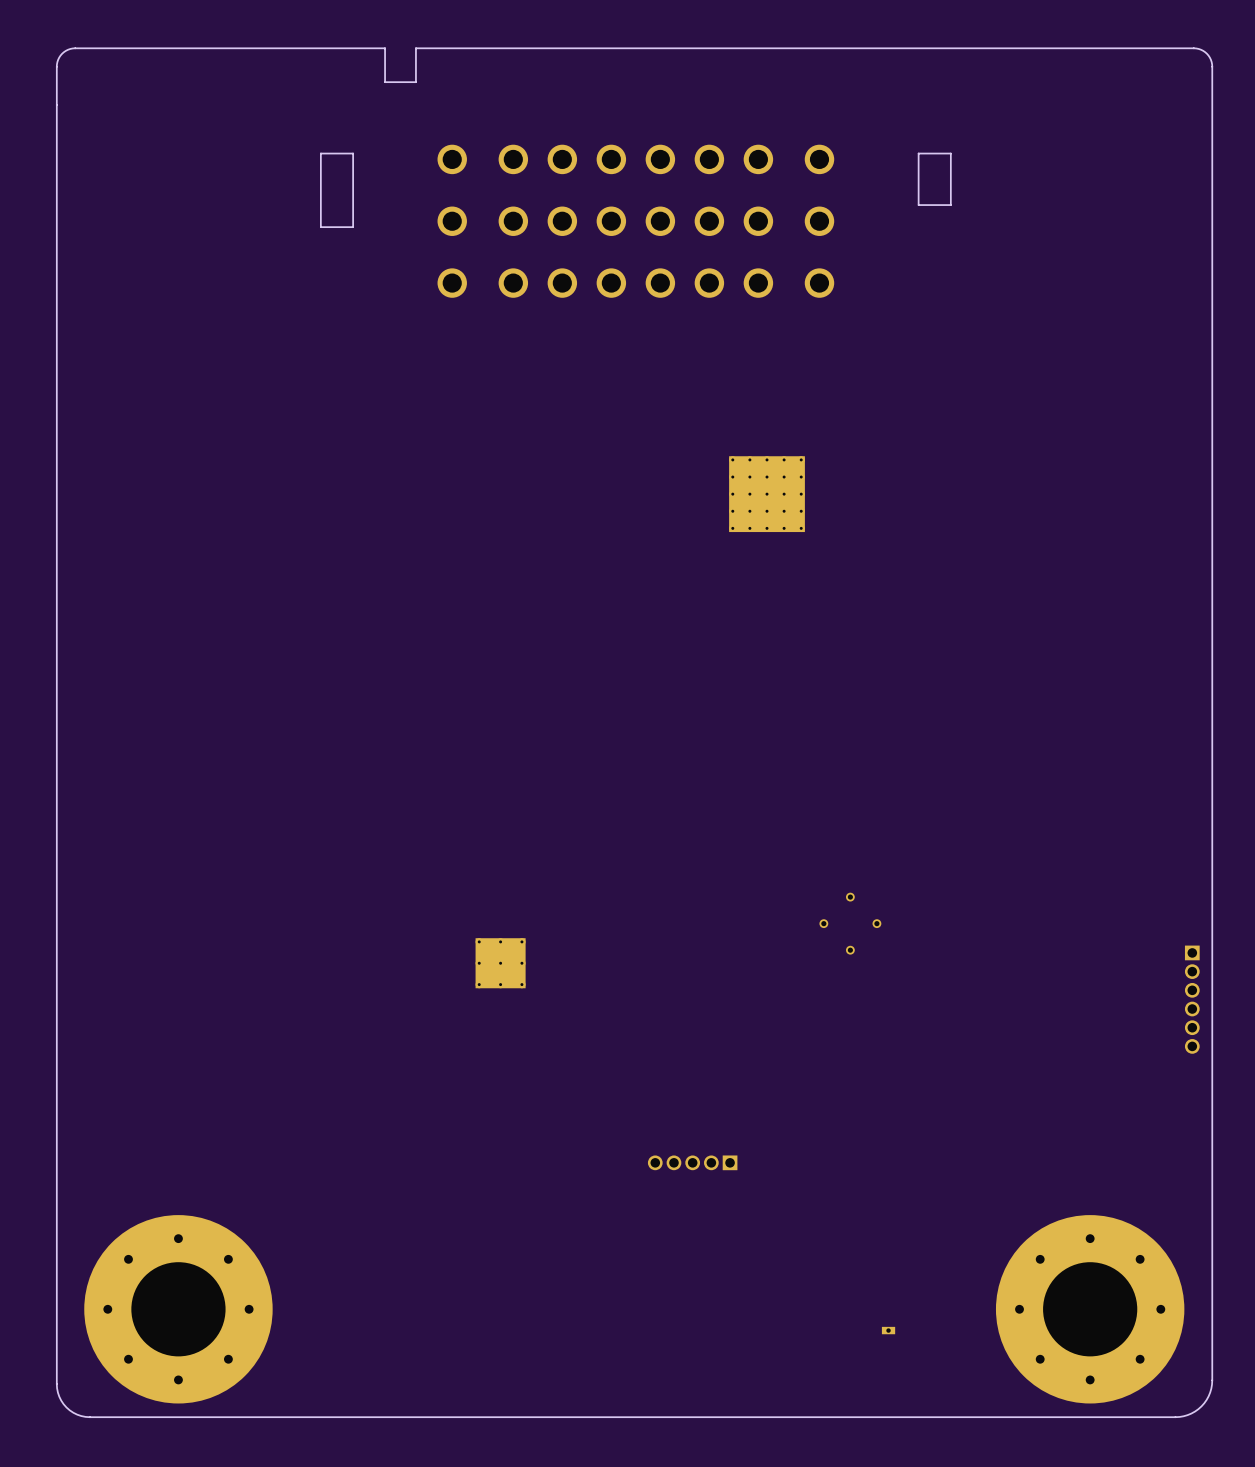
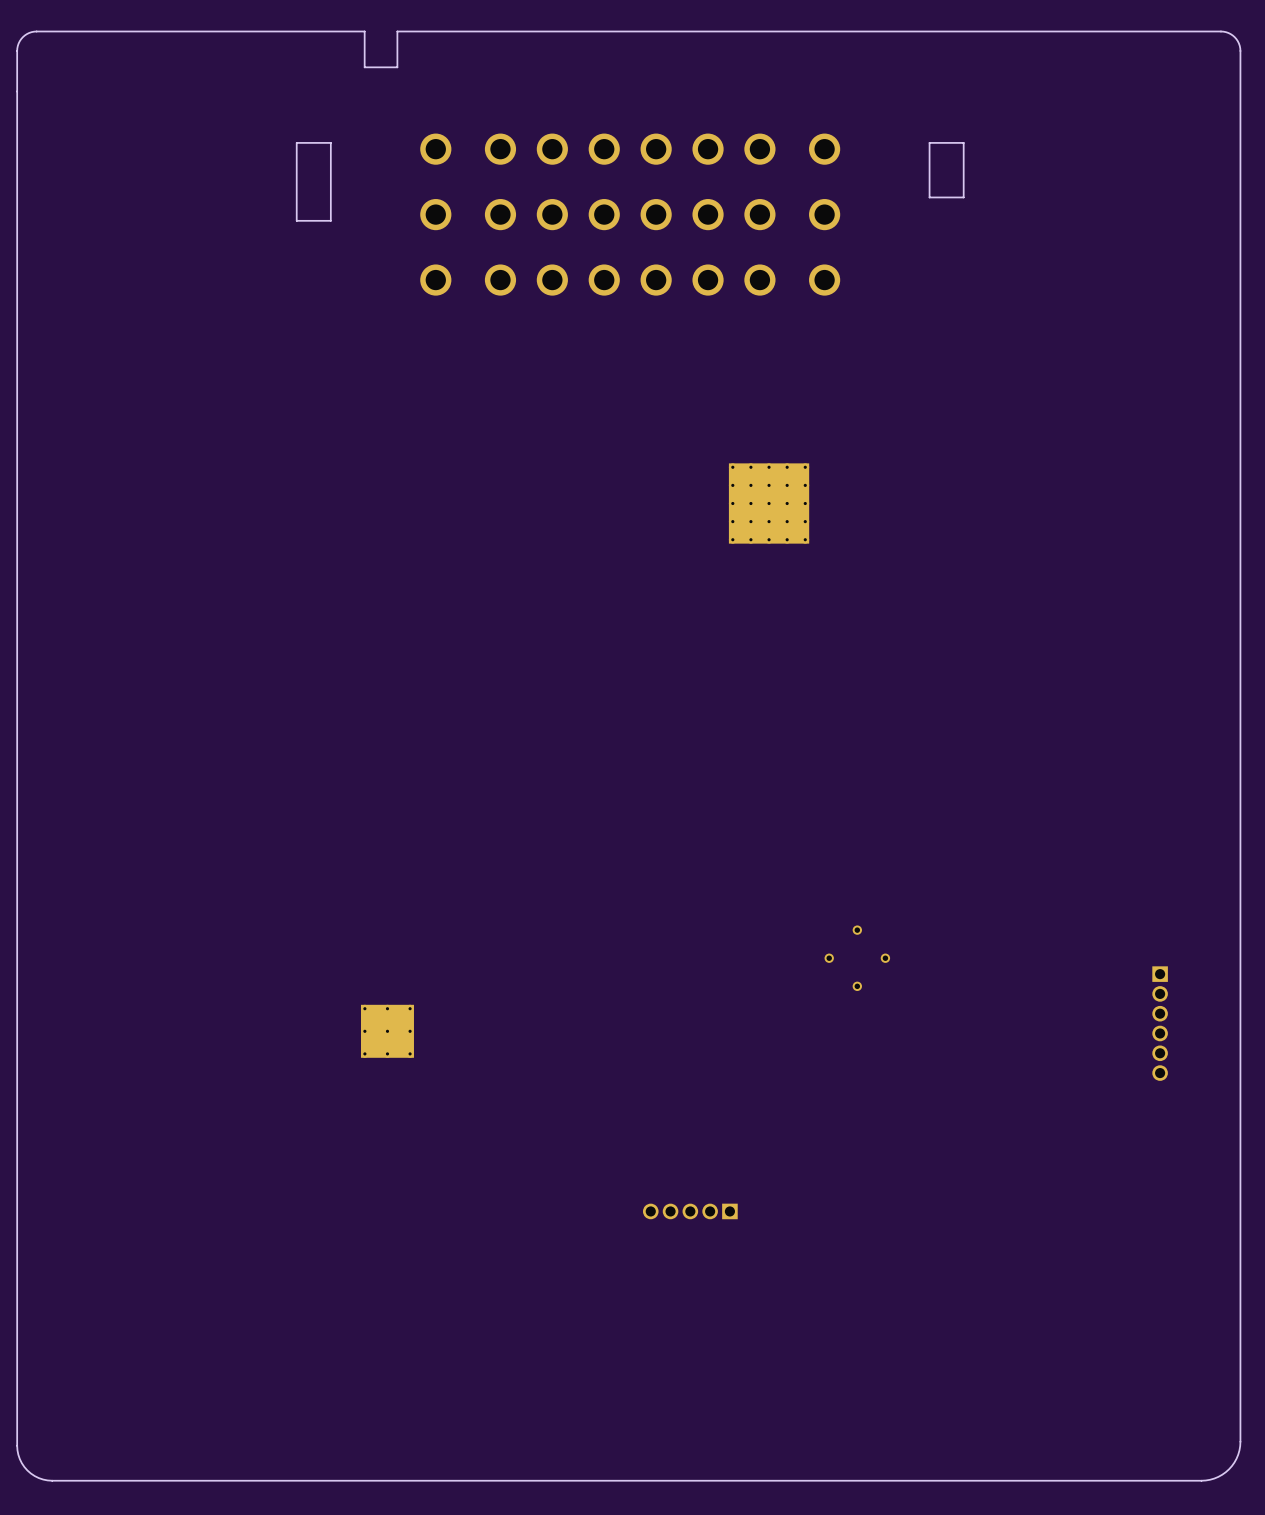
part position: (500, 963) -> (387, 1031)
part position: (1192, 999) -> (1160, 1023)
part: (178, 1309) -> none
part: (1090, 1309) -> none
part: (888, 1330) -> none

